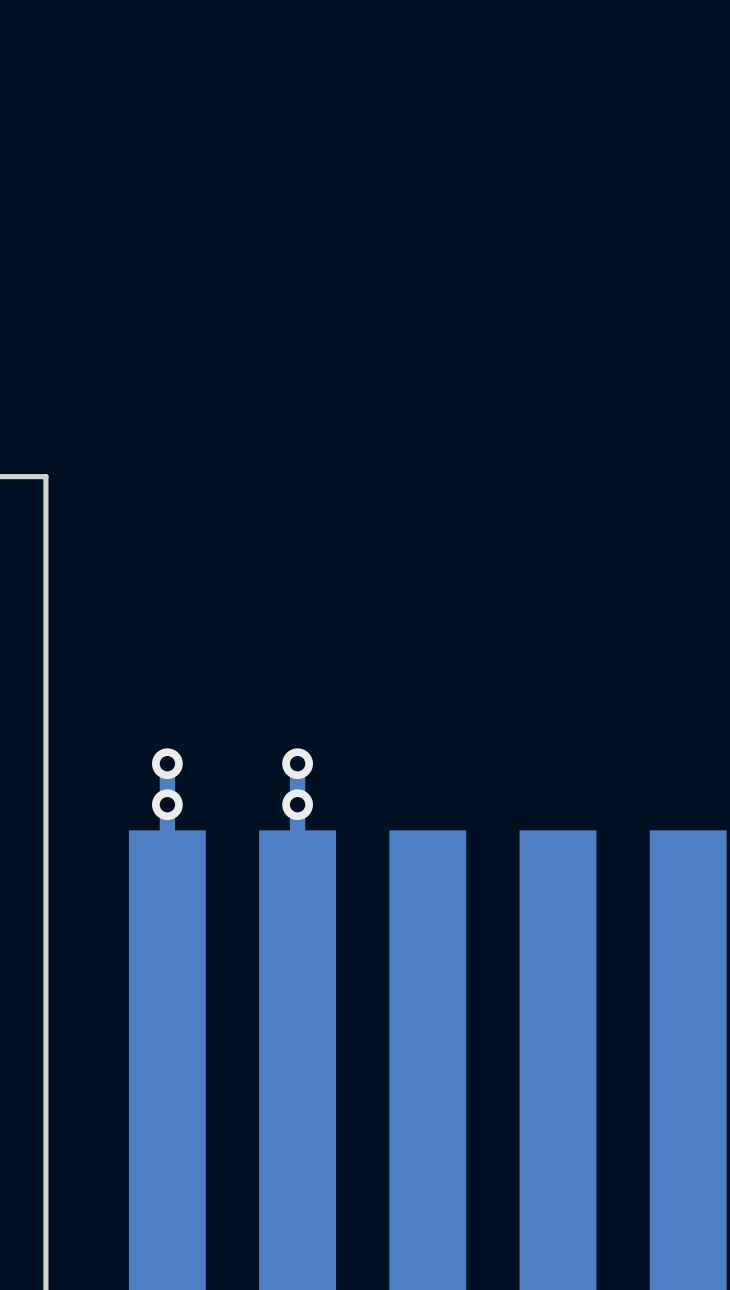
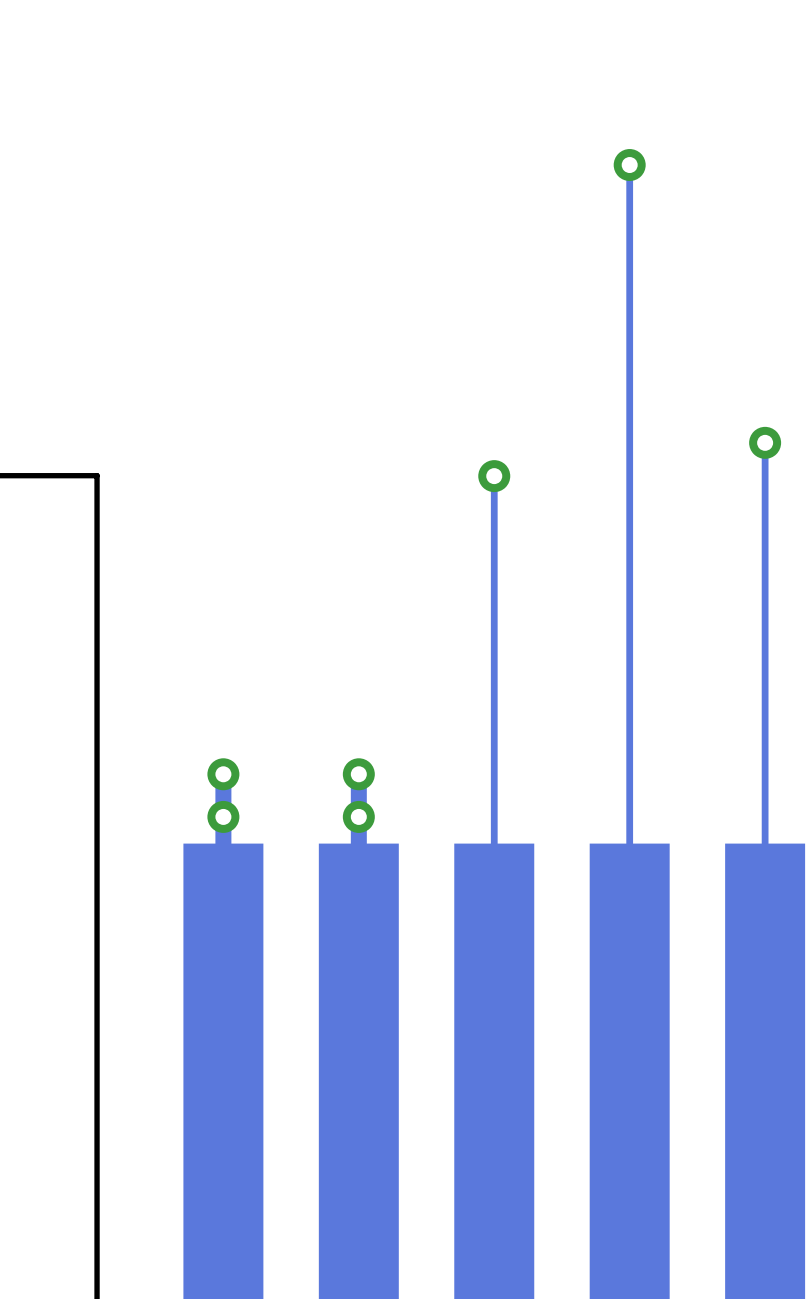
track: none -> (629, 165) (629, 1110)
via: none -> (629, 165)
track: none -> (765, 442) (765, 1110)
via: none -> (765, 442)
track: none -> (494, 476) (494, 1110)
via: none -> (494, 476)

